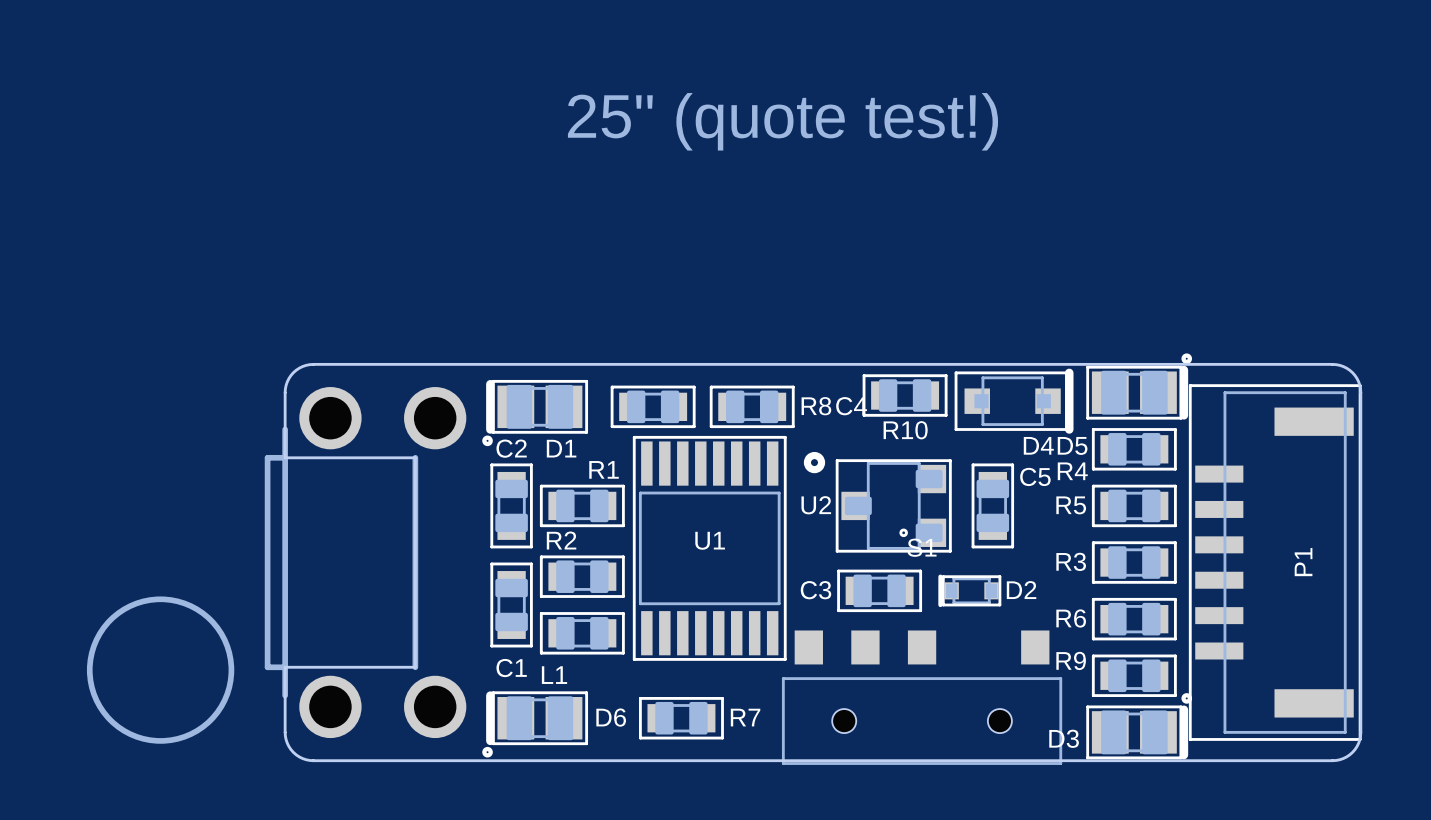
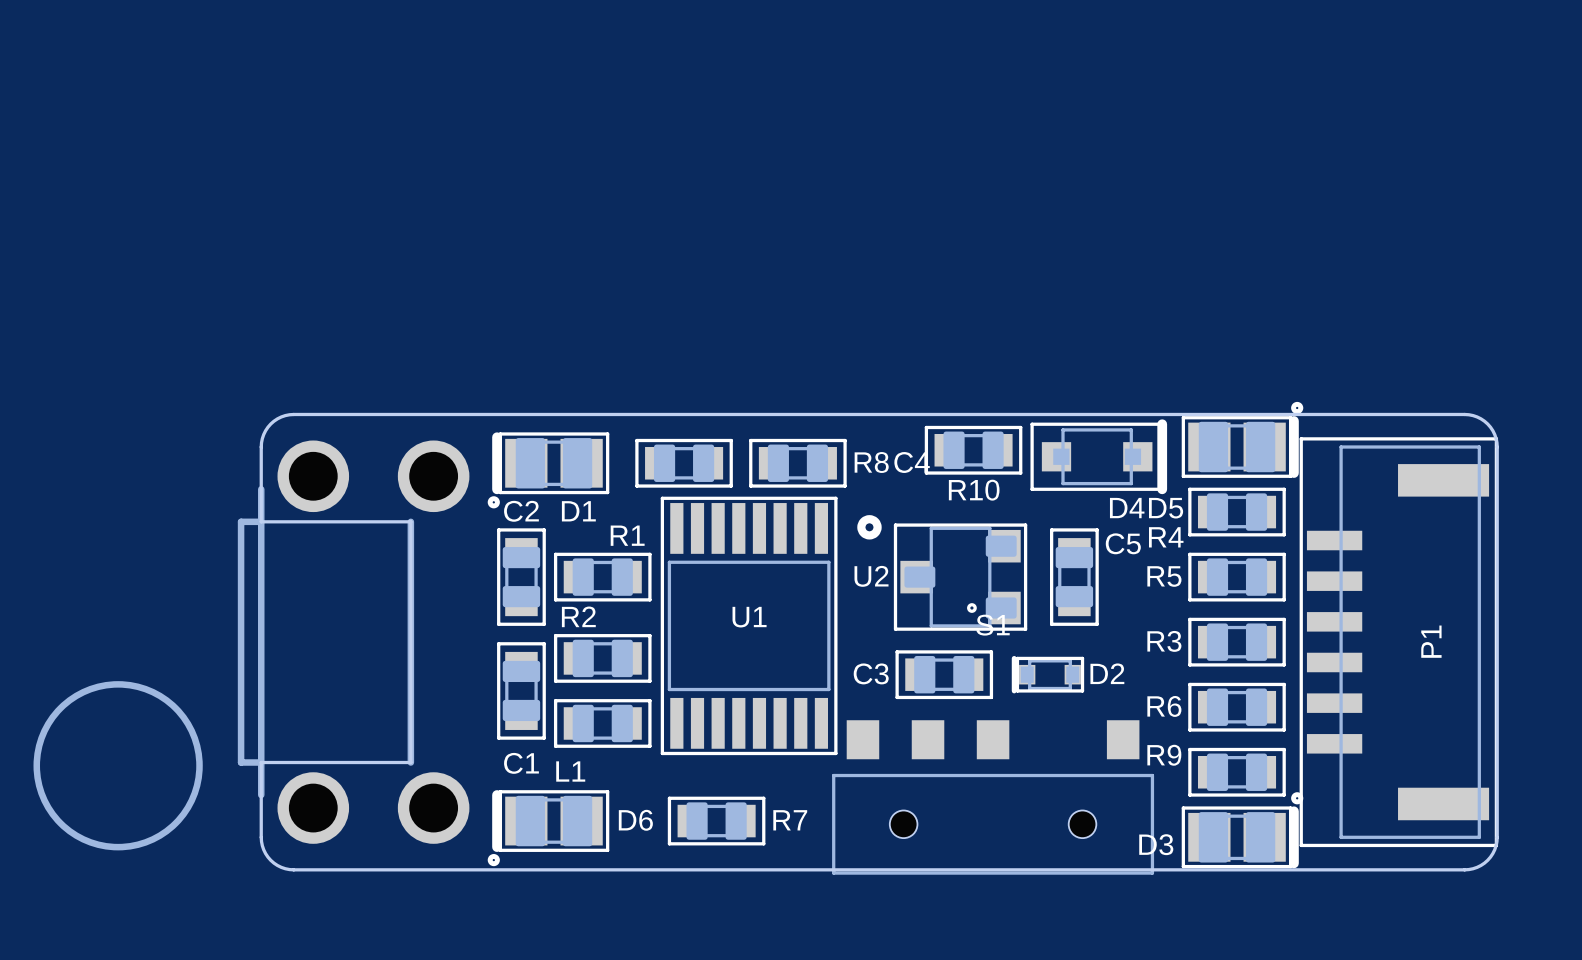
text: 25" (quote test!) (782, 121) -> none

